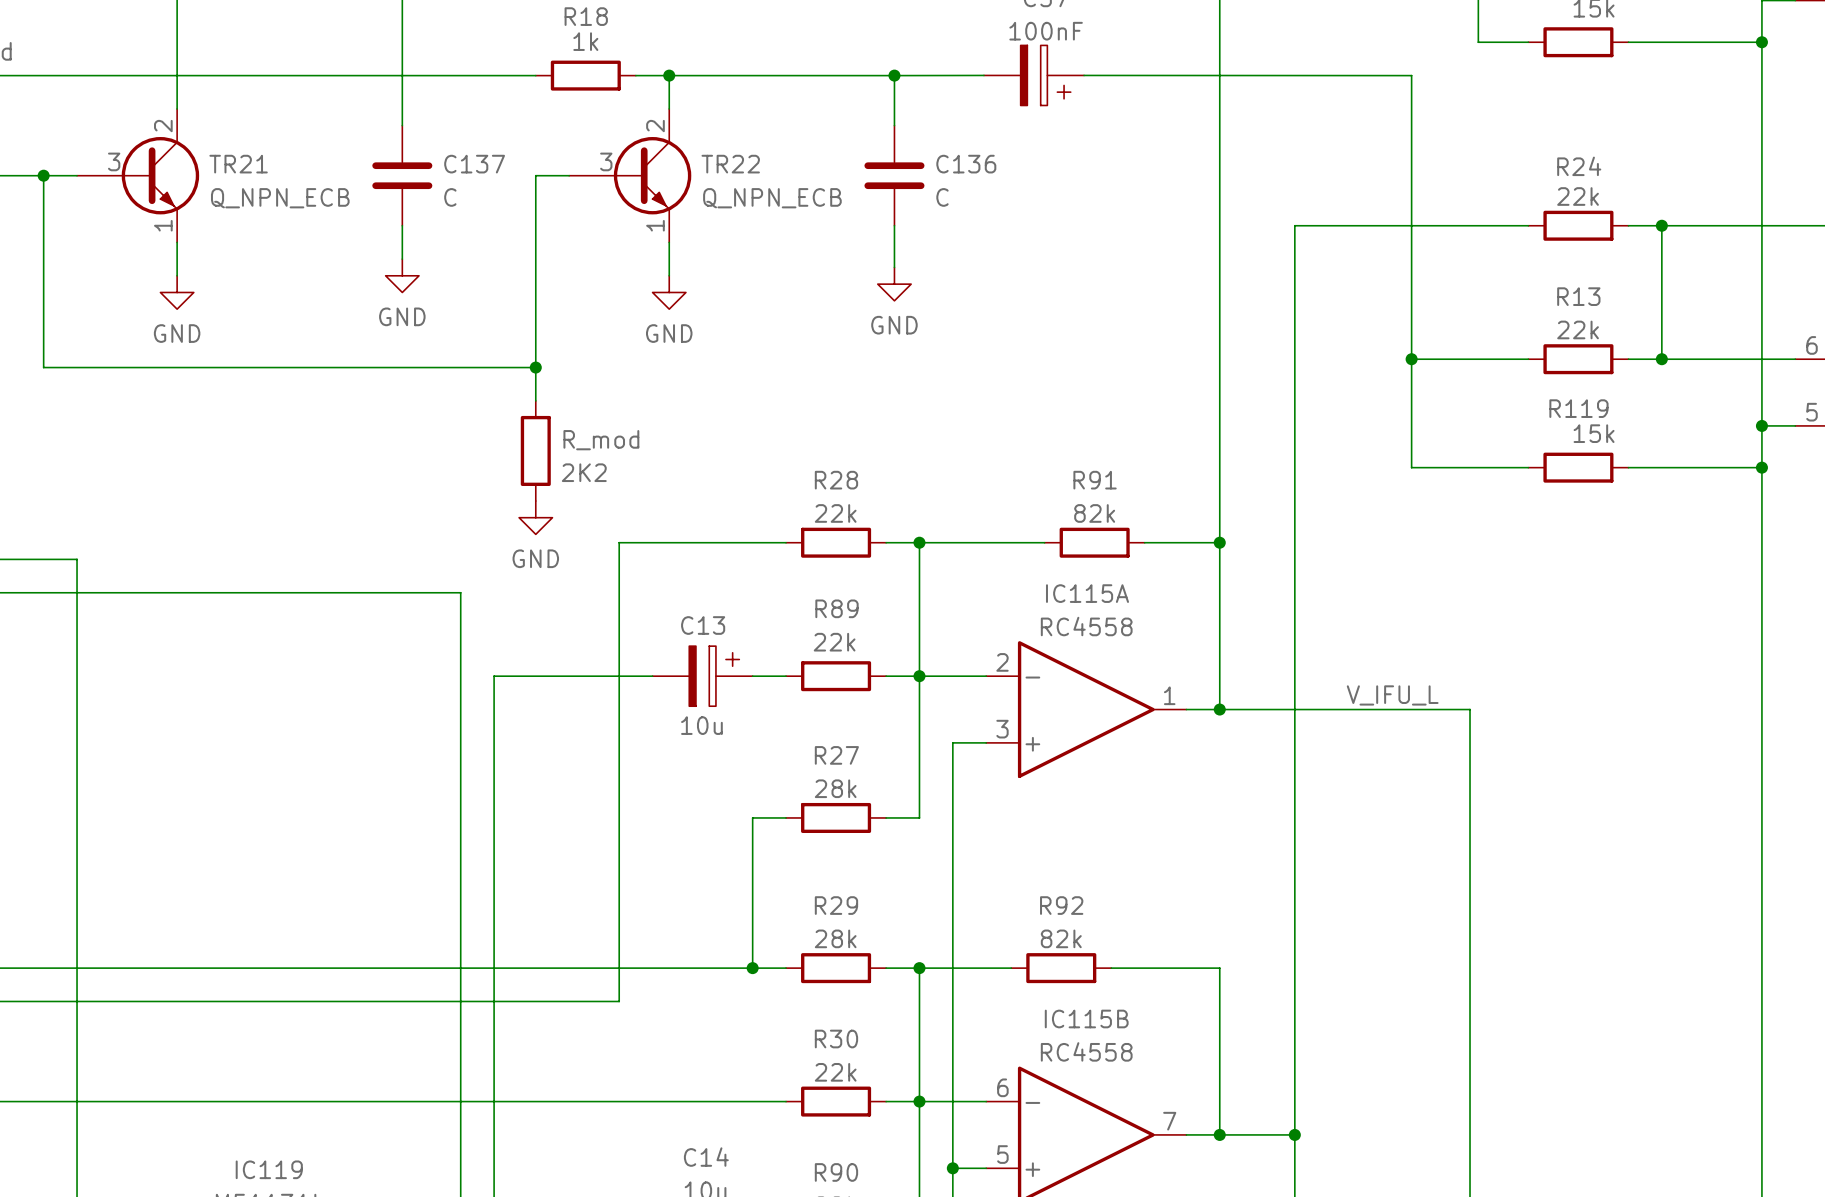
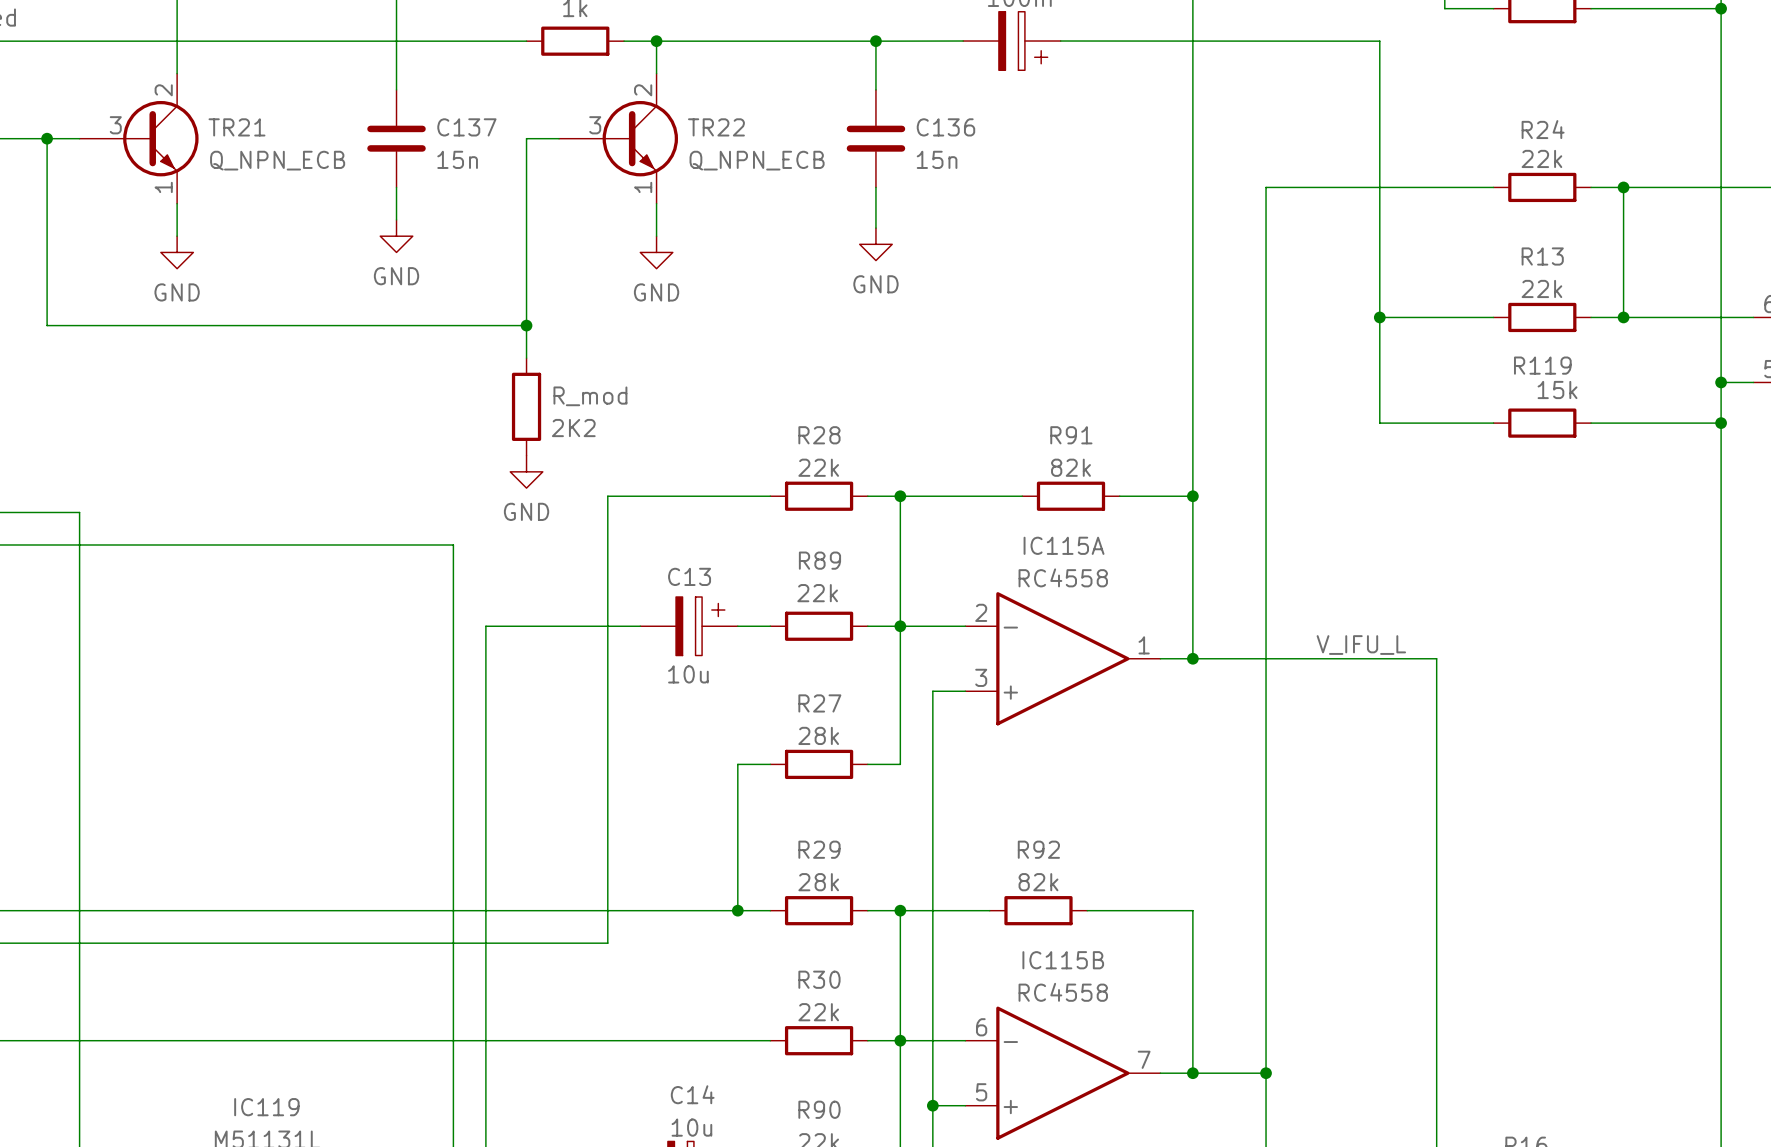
C137 value: C (450, 197) -> 15n (457, 159)
C136 value: C (942, 197) -> 15n (937, 159)

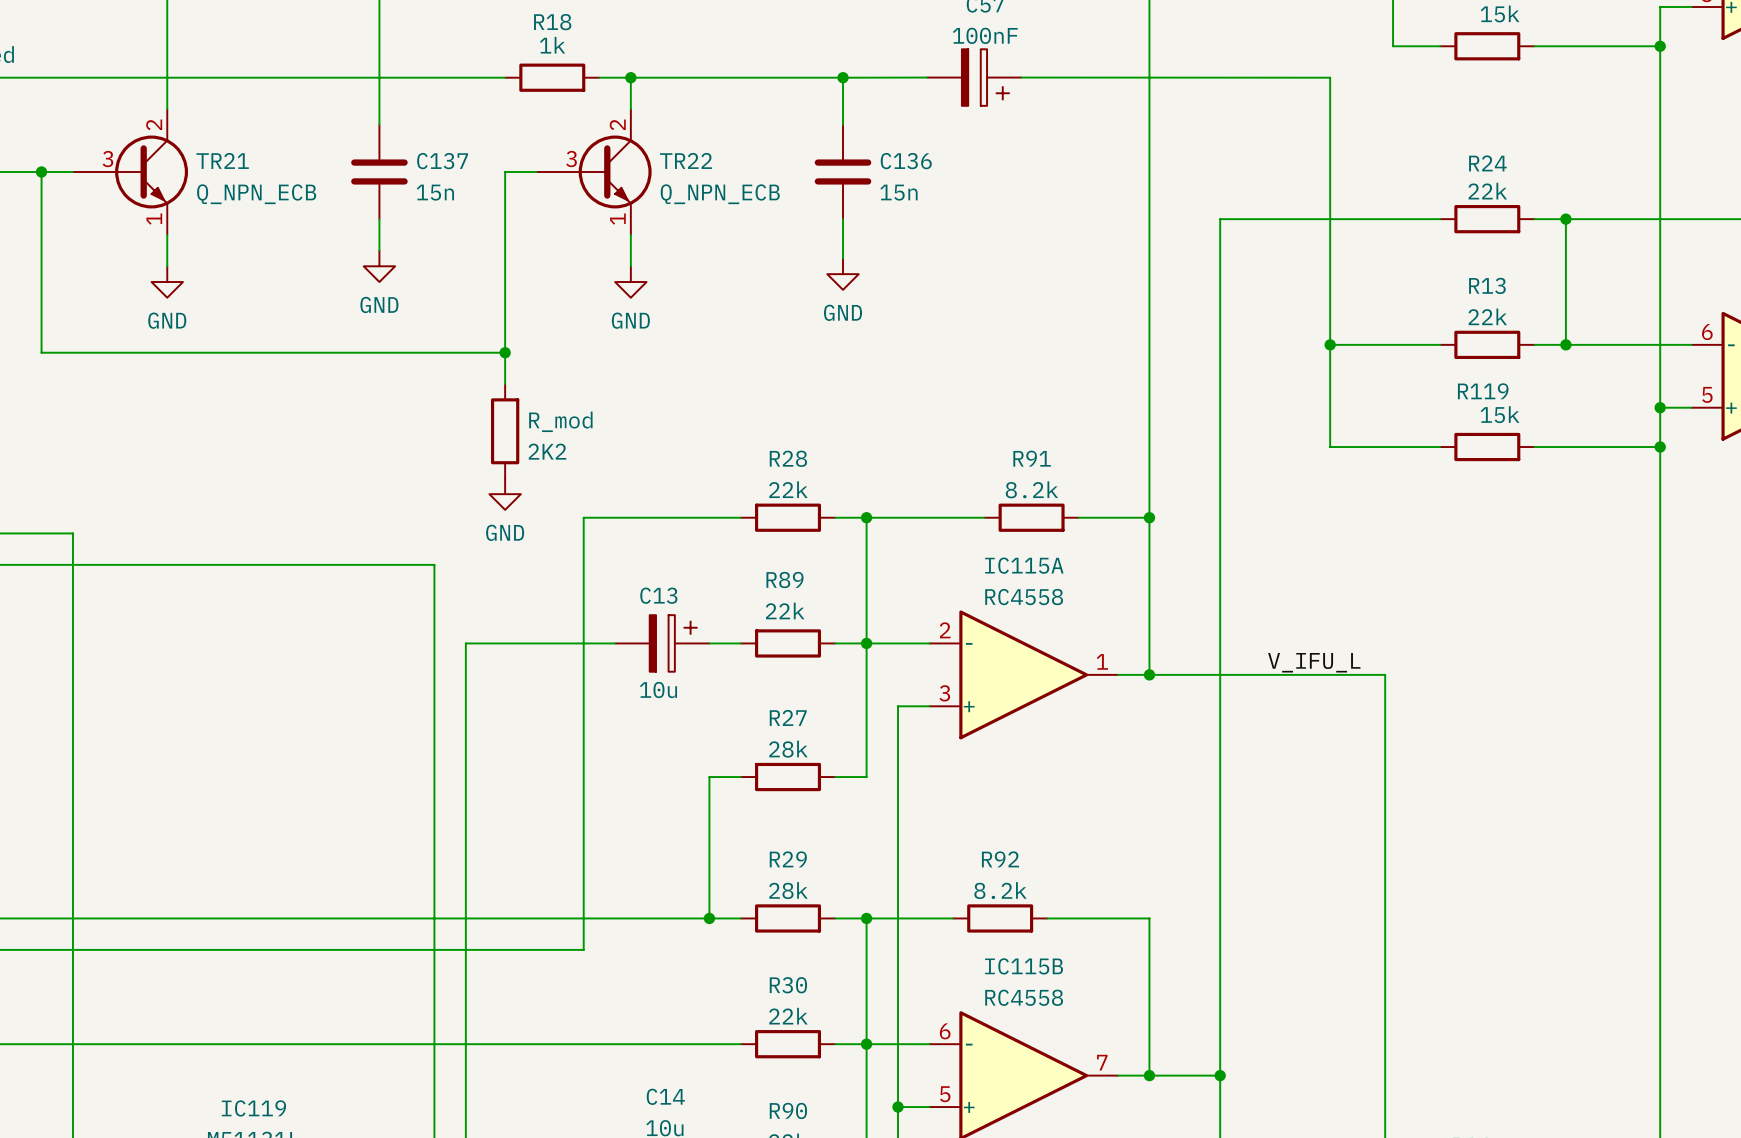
R91 value: 82k (1070, 467) -> 8.2k (1031, 489)
R92 value: 82k (1038, 882) -> 8.2k (1000, 890)

